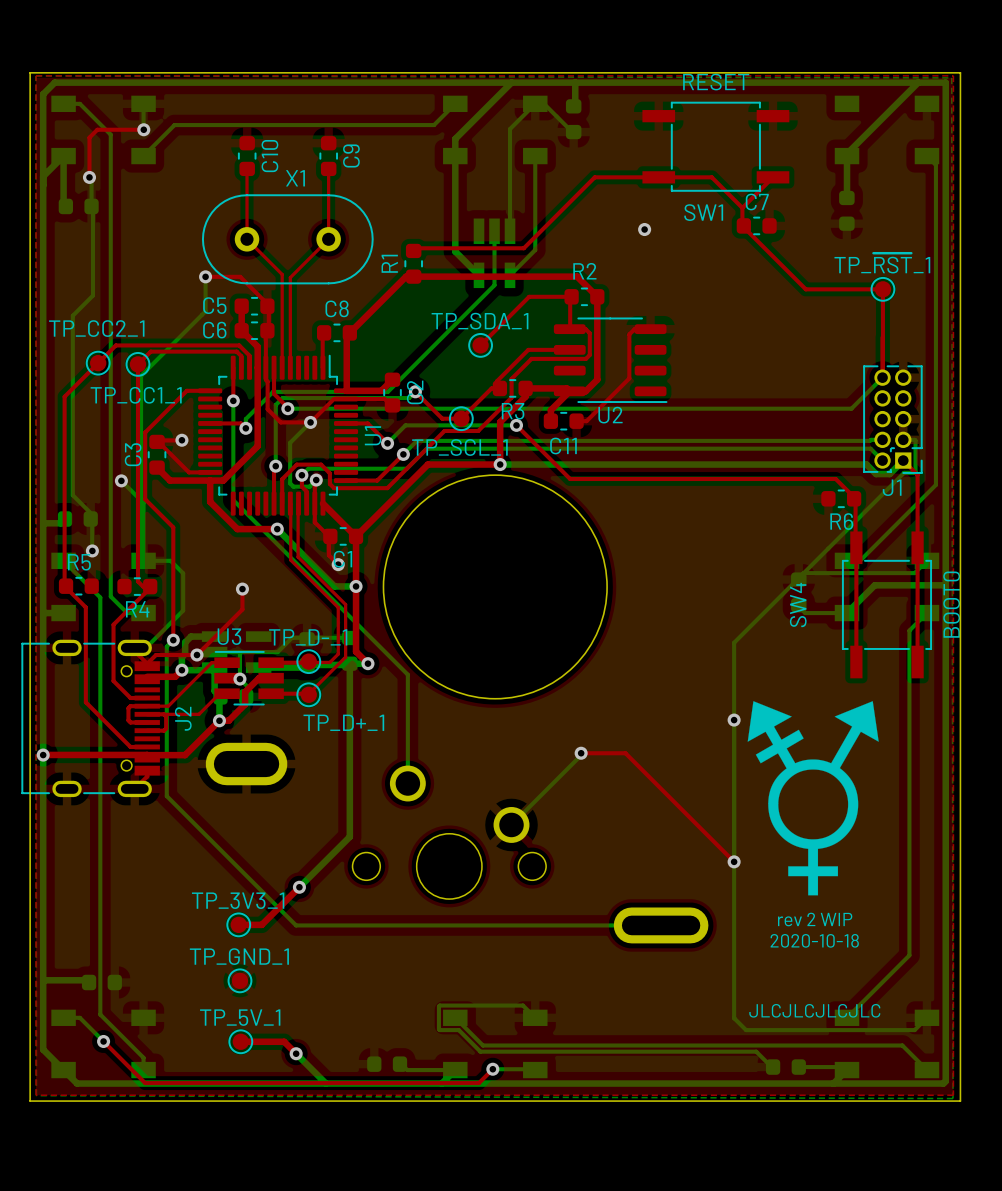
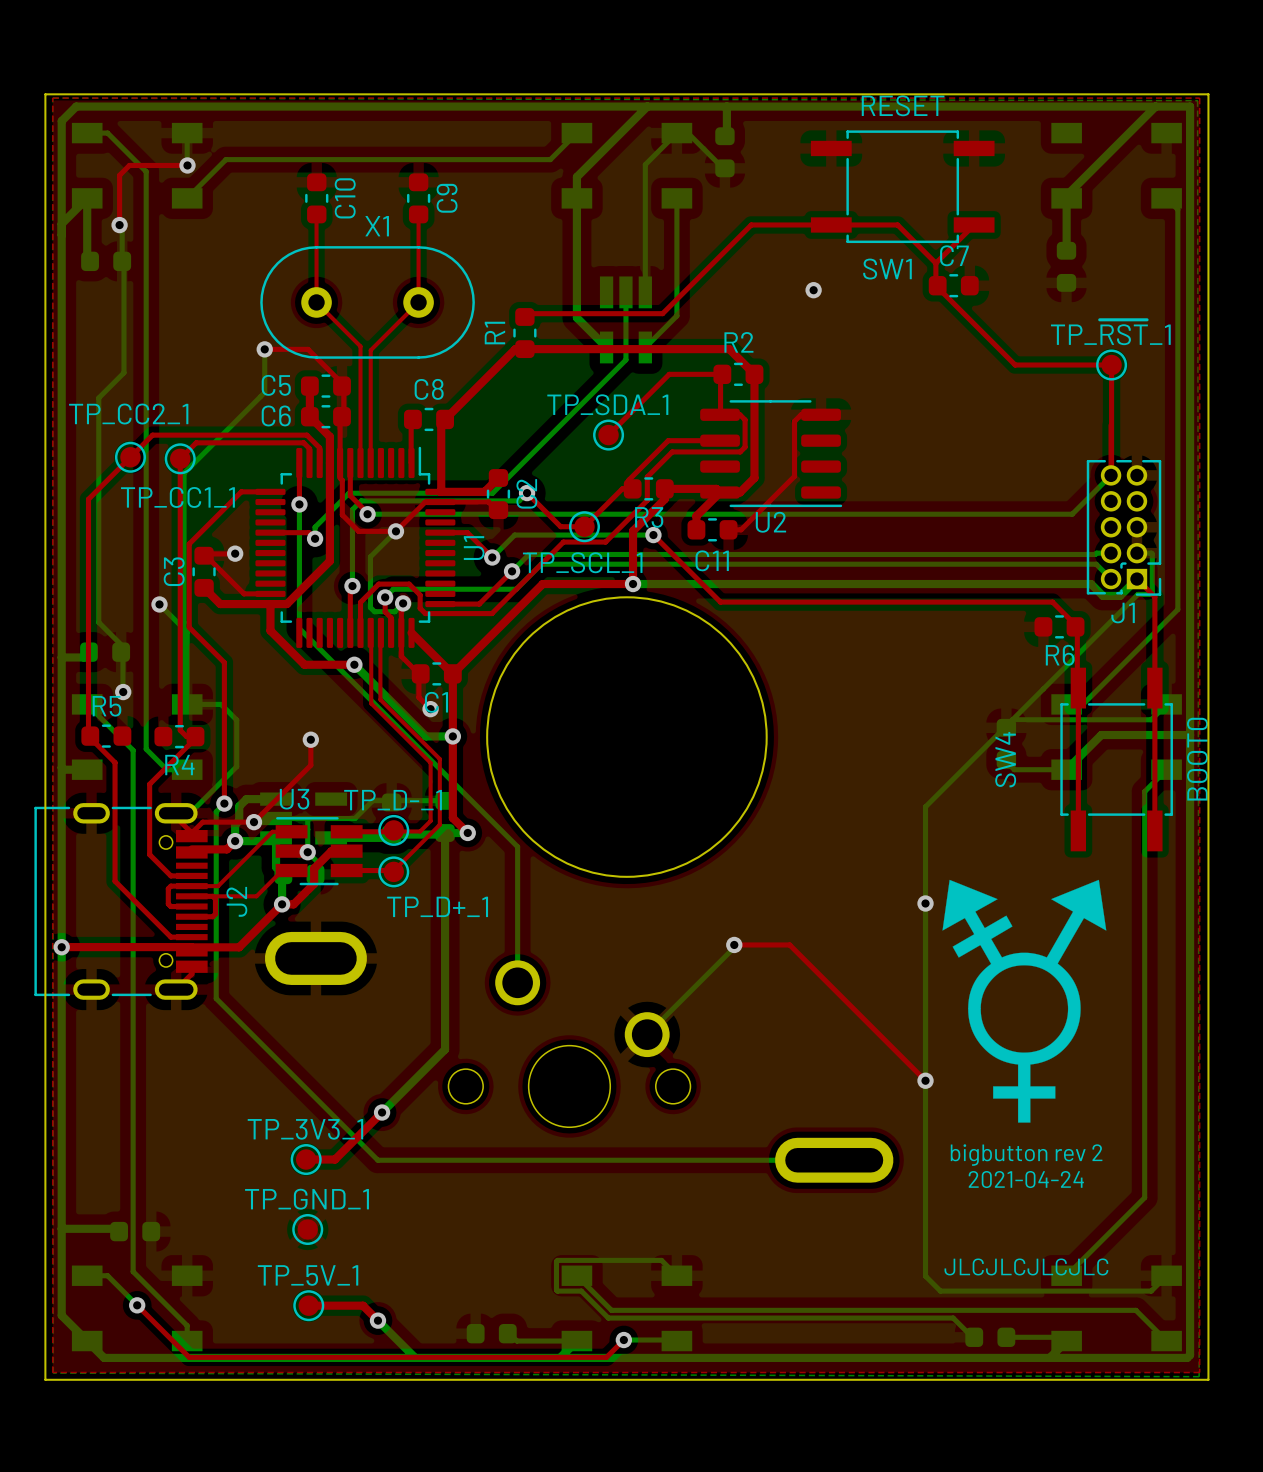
text: rev 2 WIP (815, 919) -> bigbutton rev 2 (1026, 1155)
text: 2020-10-18 (814, 940) -> 2021-04-24 (1026, 1179)

